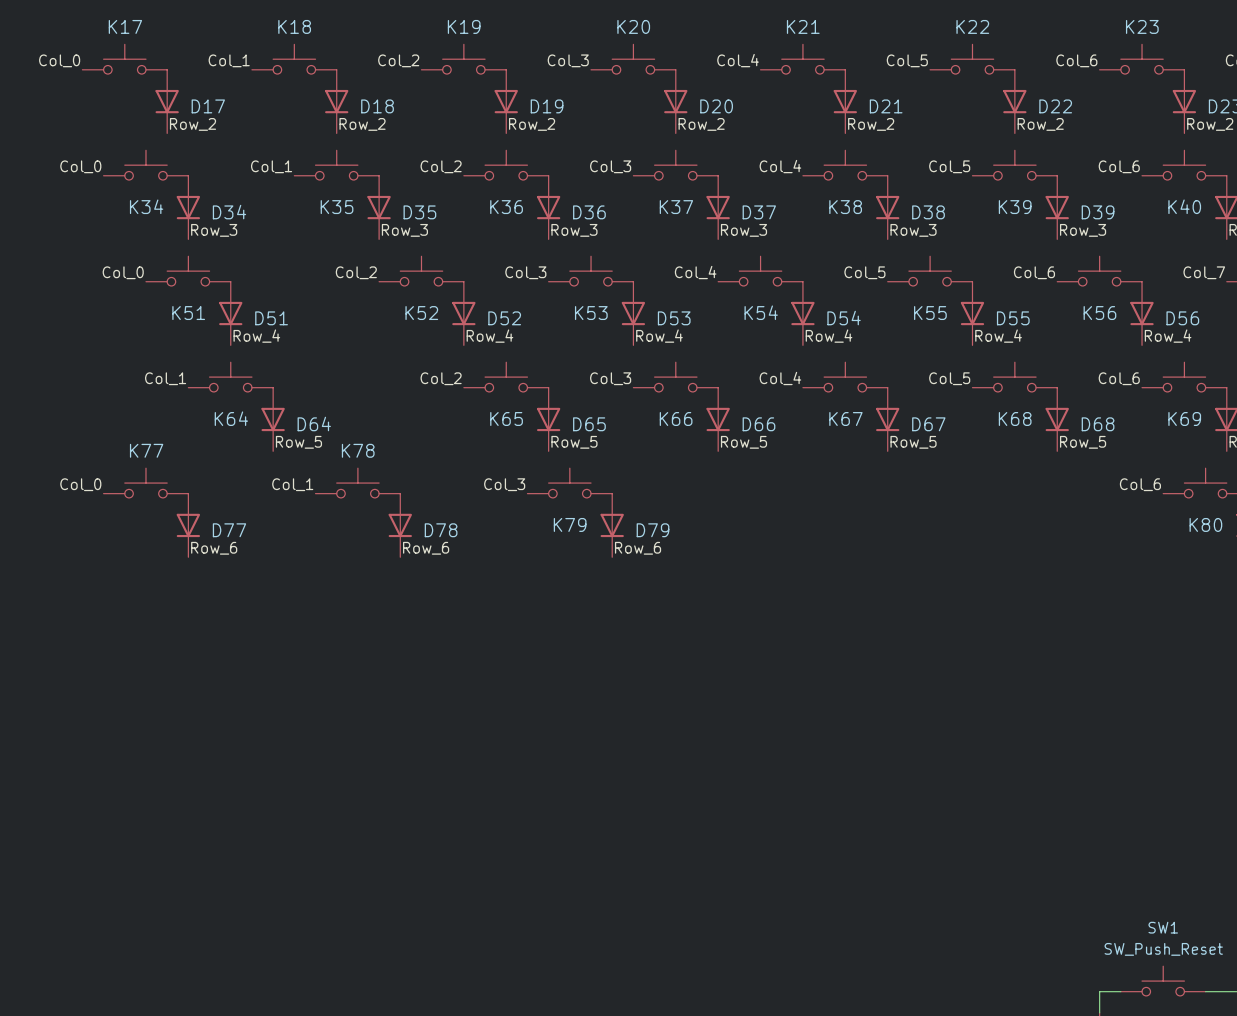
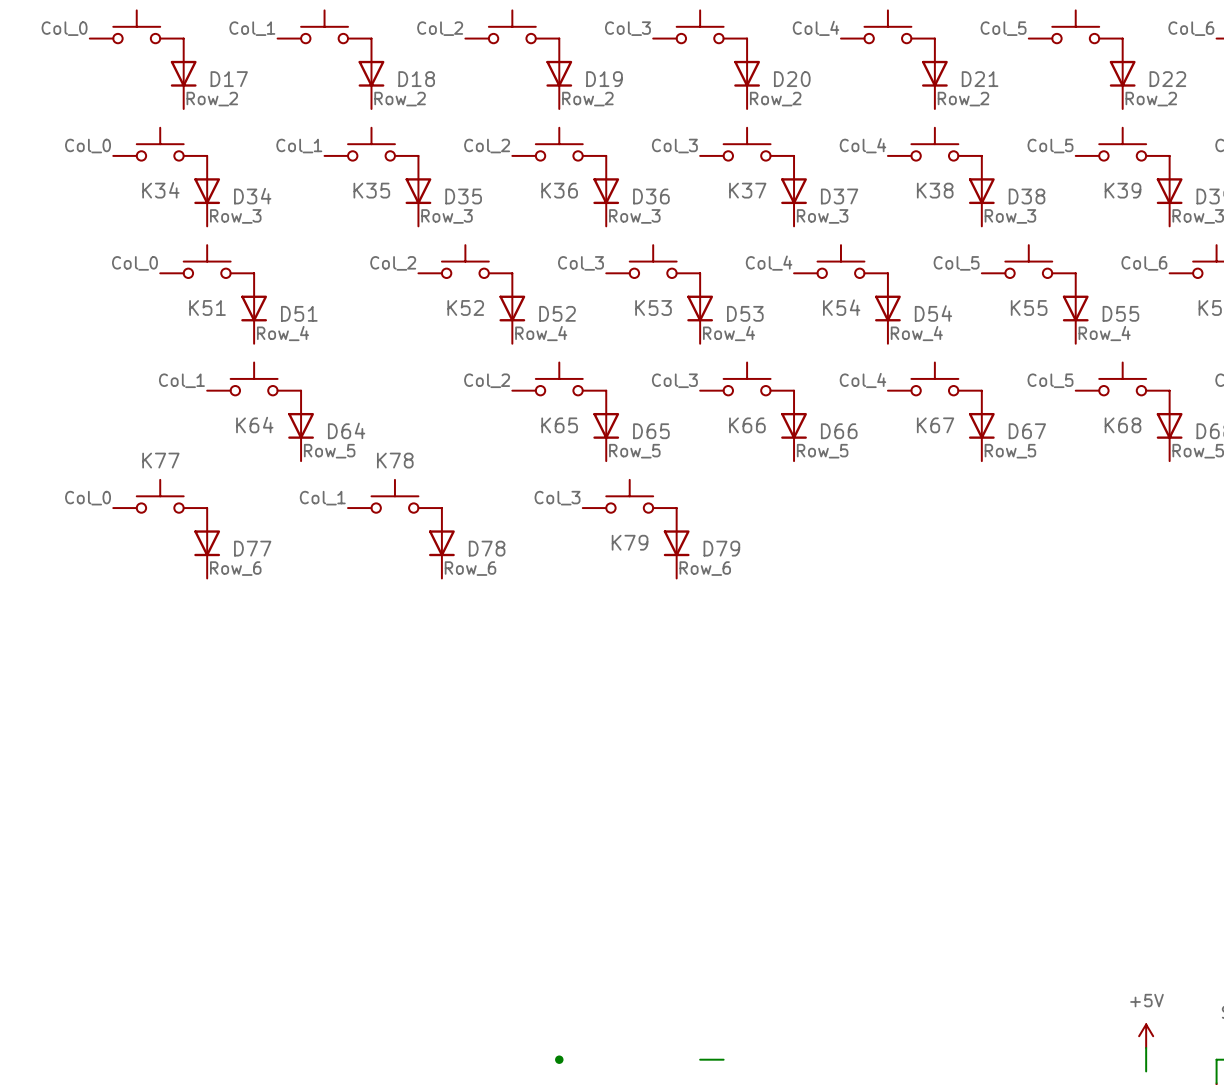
power symbol: none -> +5V (1146, 1036)
wire: none -> (1146, 1047) (1146, 1071)
junction: none -> (559, 1059)
wire: none -> (700, 1059) (723, 1059)

